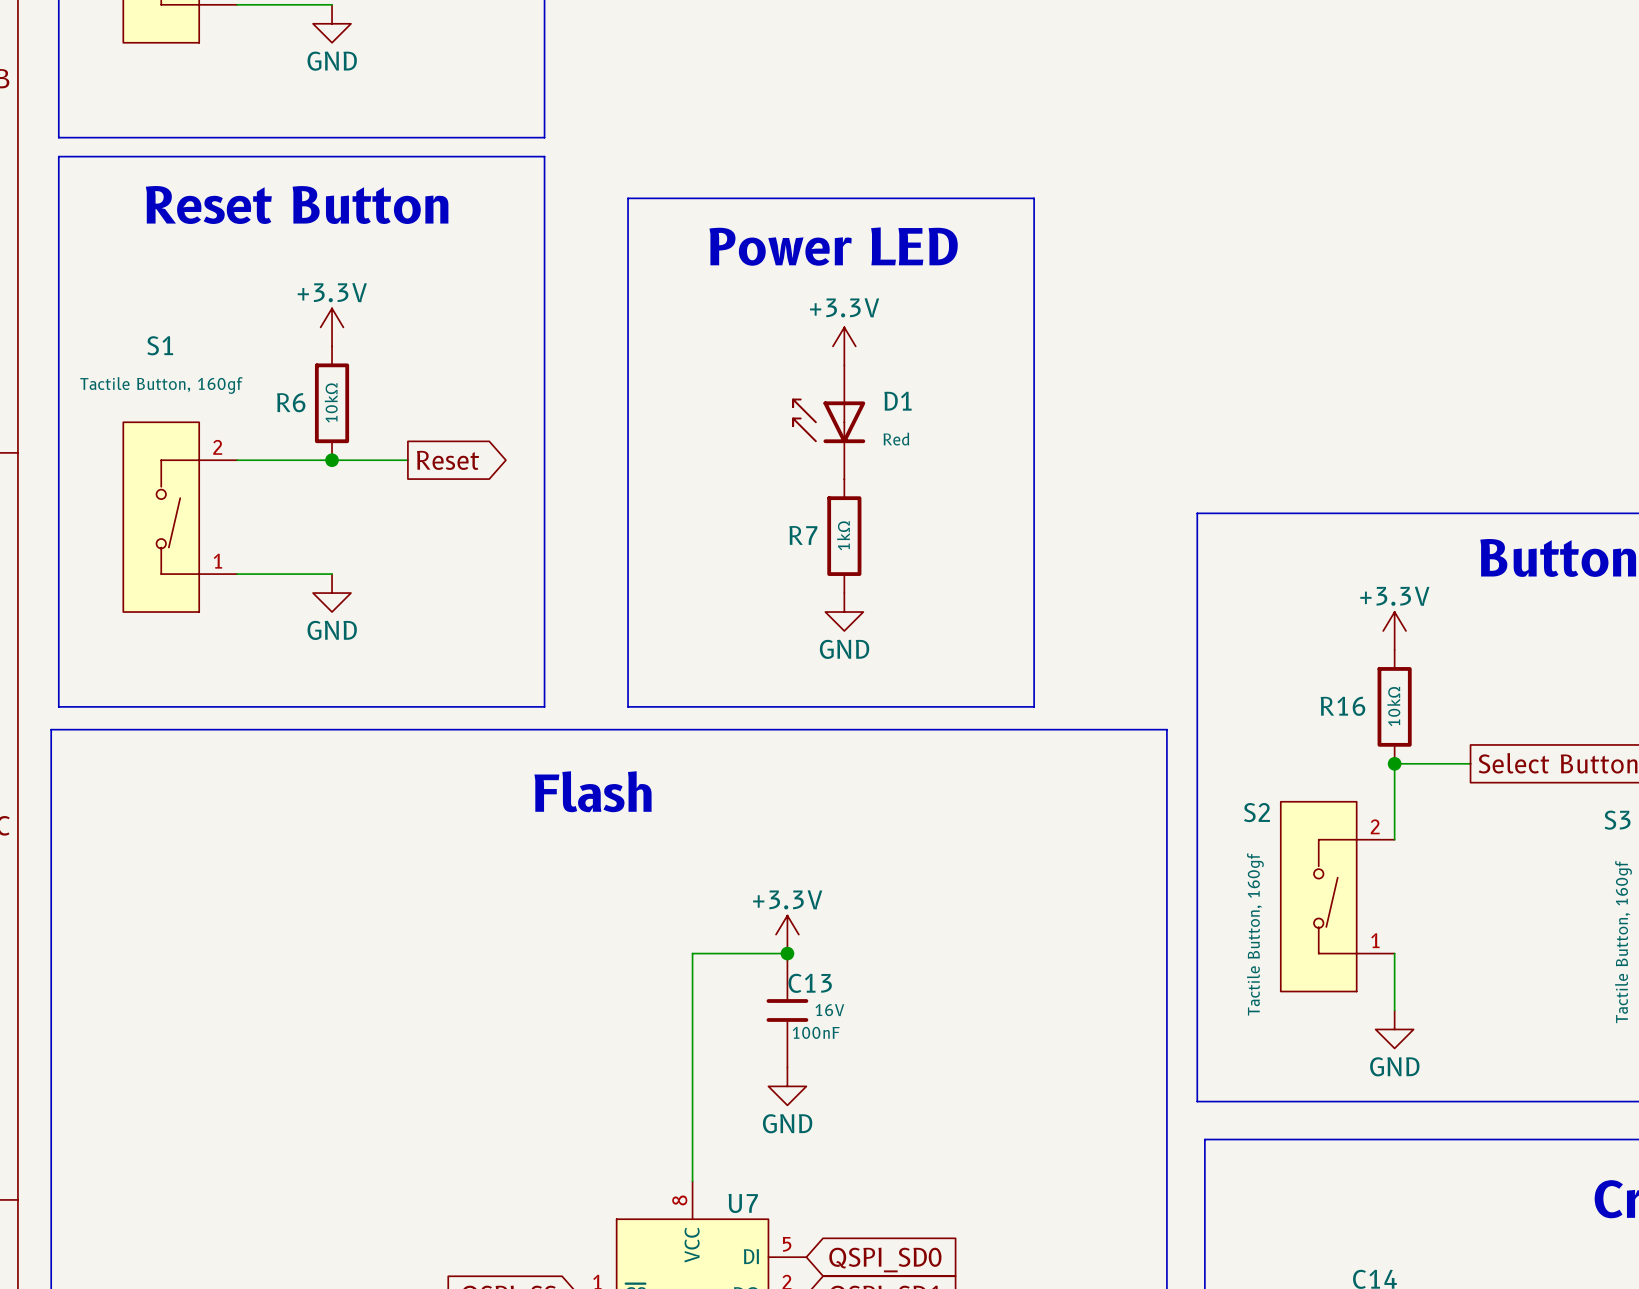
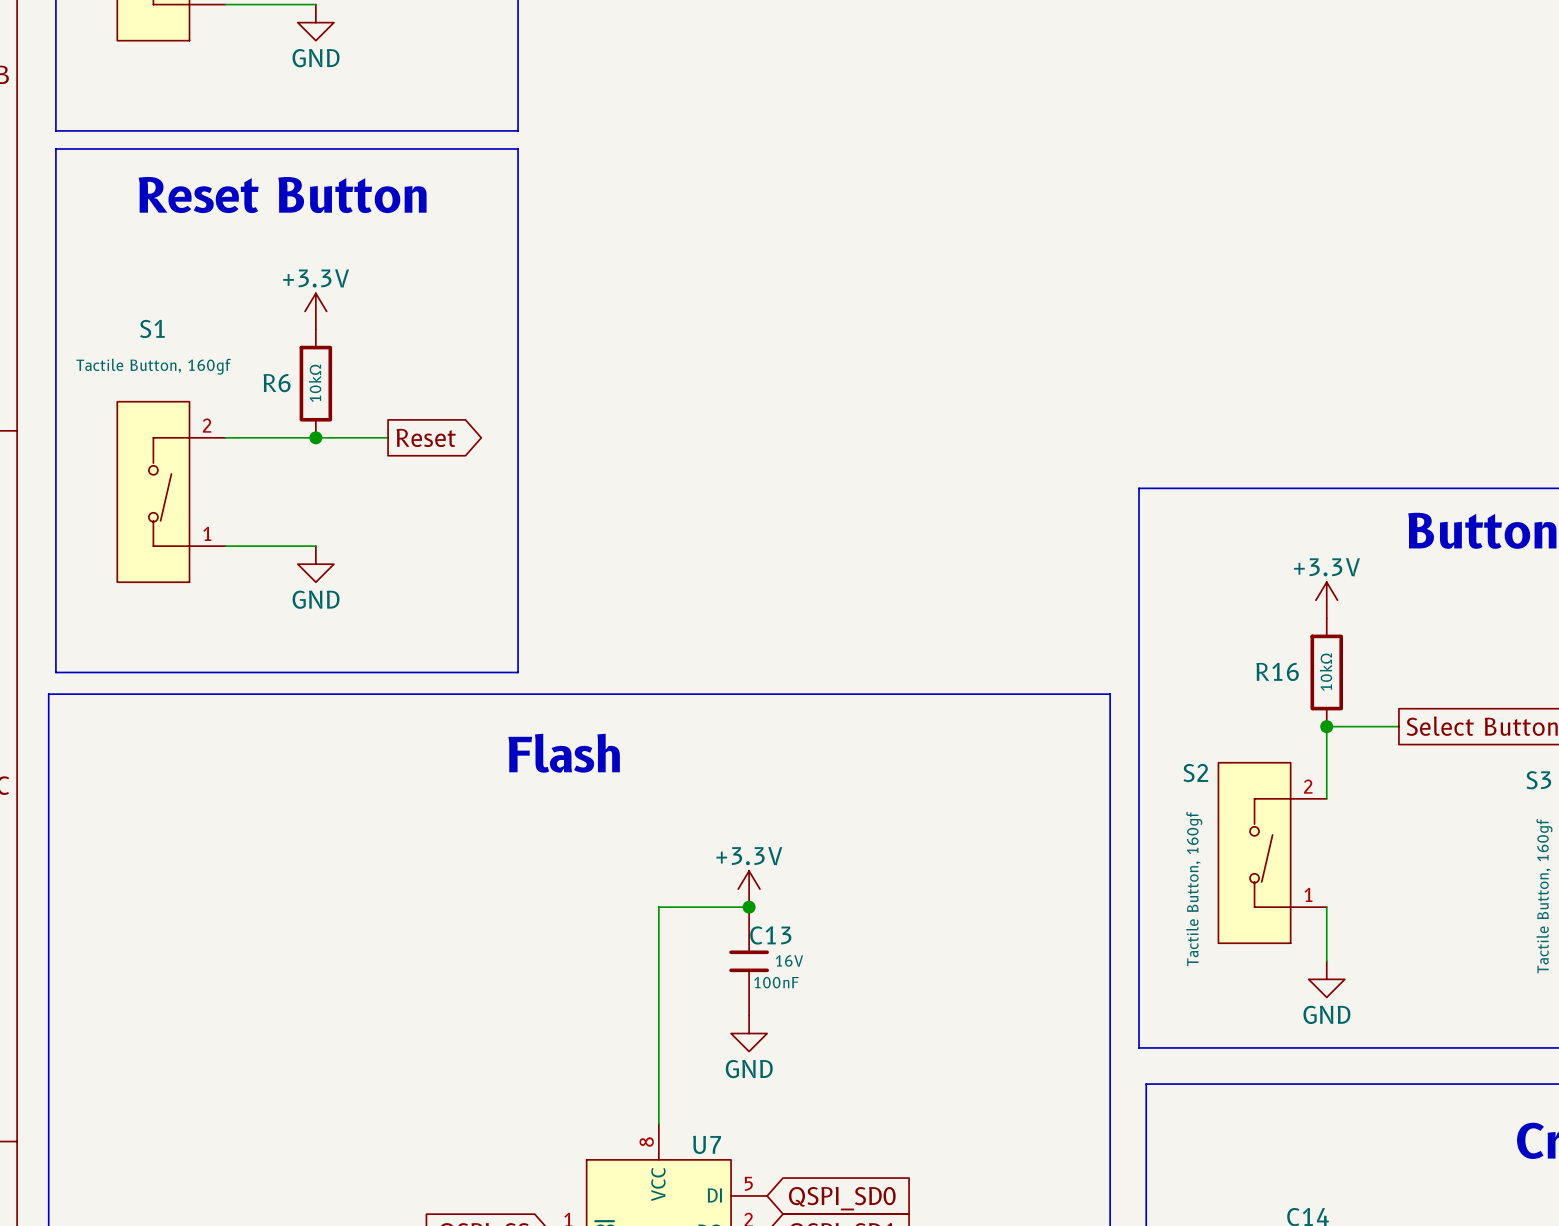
line: (628, 198) (1034, 198) (1034, 706) (628, 706) (628, 198) -> none
text: Power LED (833, 246) -> none
power symbol: +3.3V (844, 346) -> none
D1: Red (828, 422) -> none
R7: 1kΩ (844, 536) -> none
power symbol: GND (844, 612) -> none

